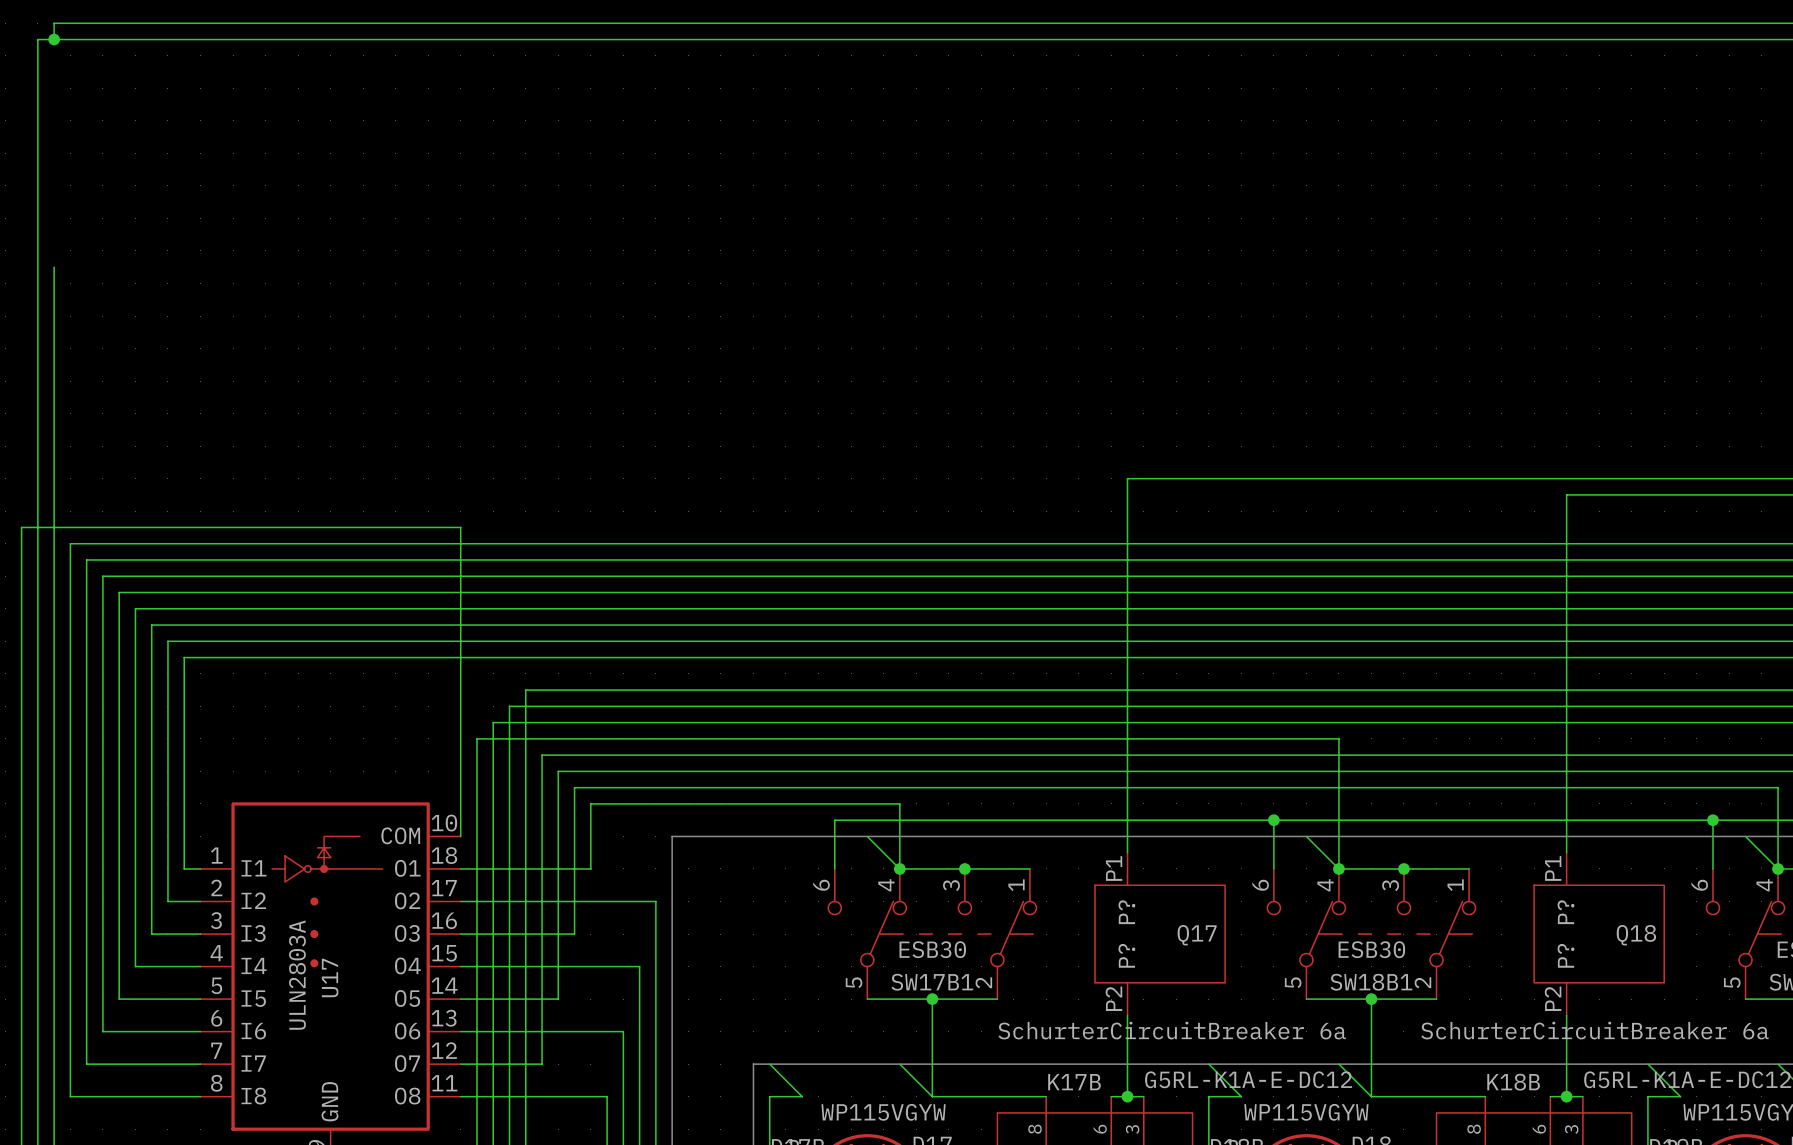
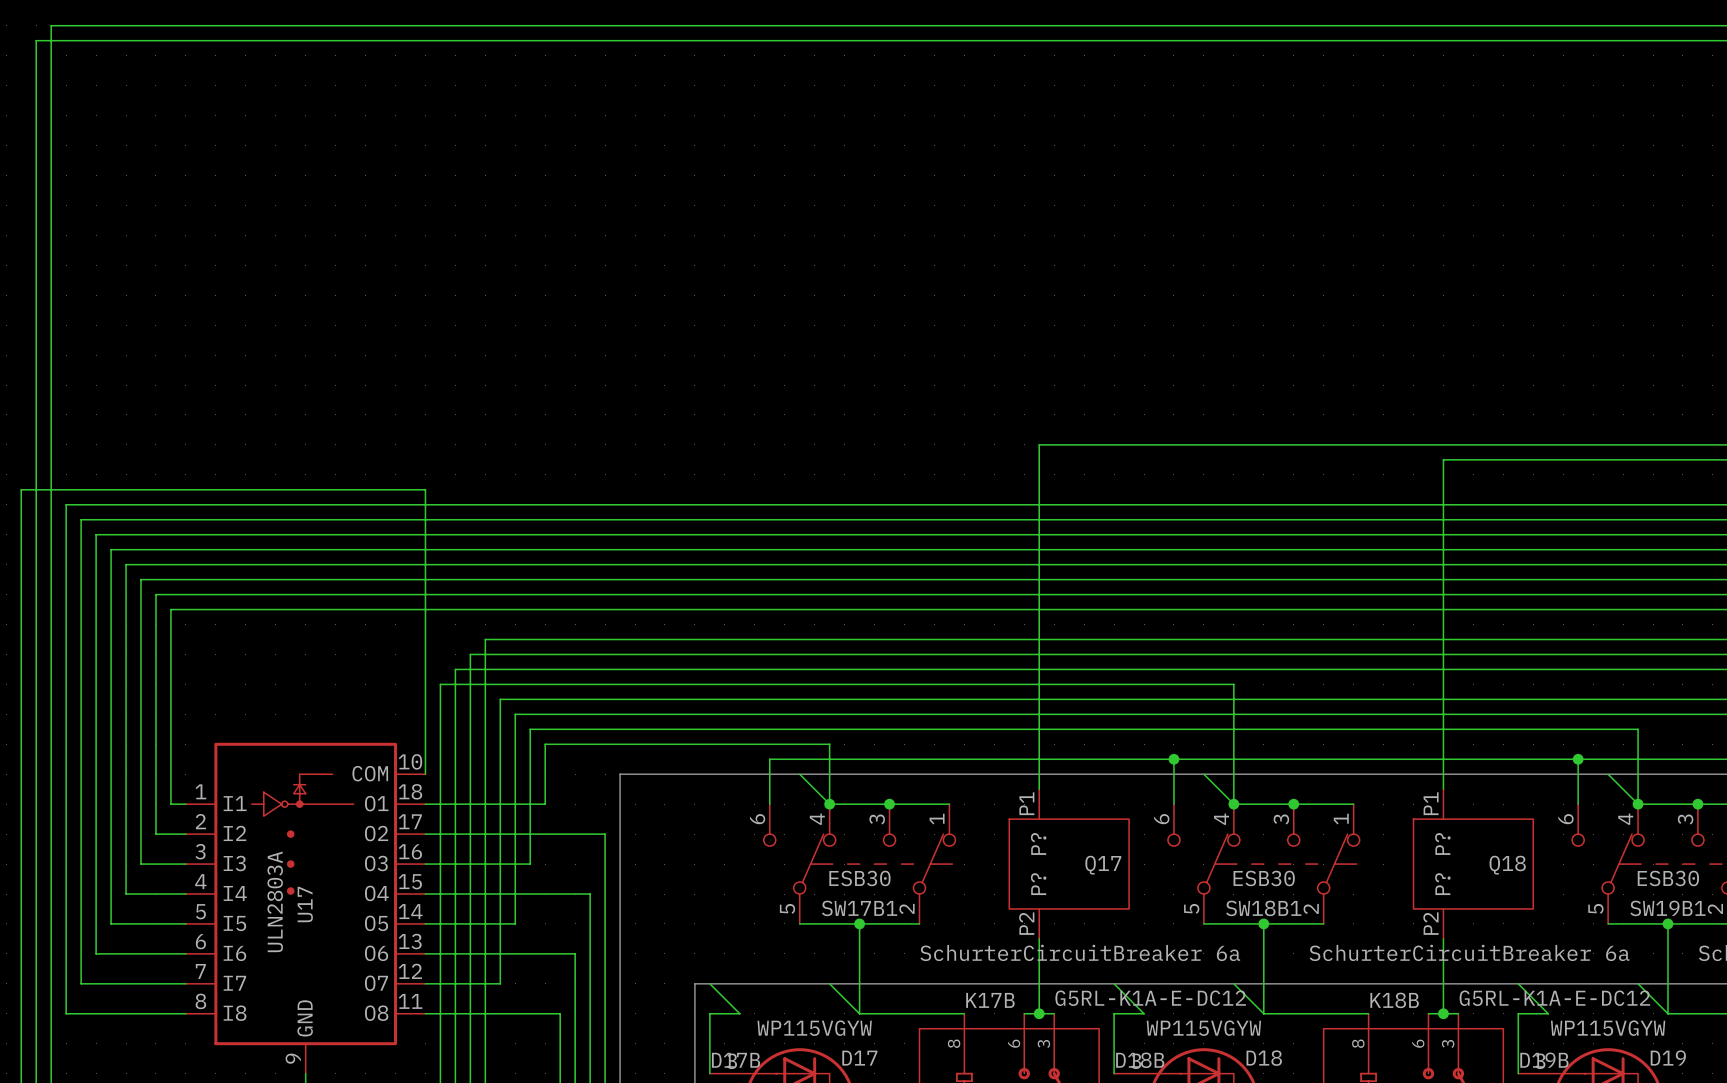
wire: none -> (51, 40) (51, 250)
junction: (54, 39) -> none

